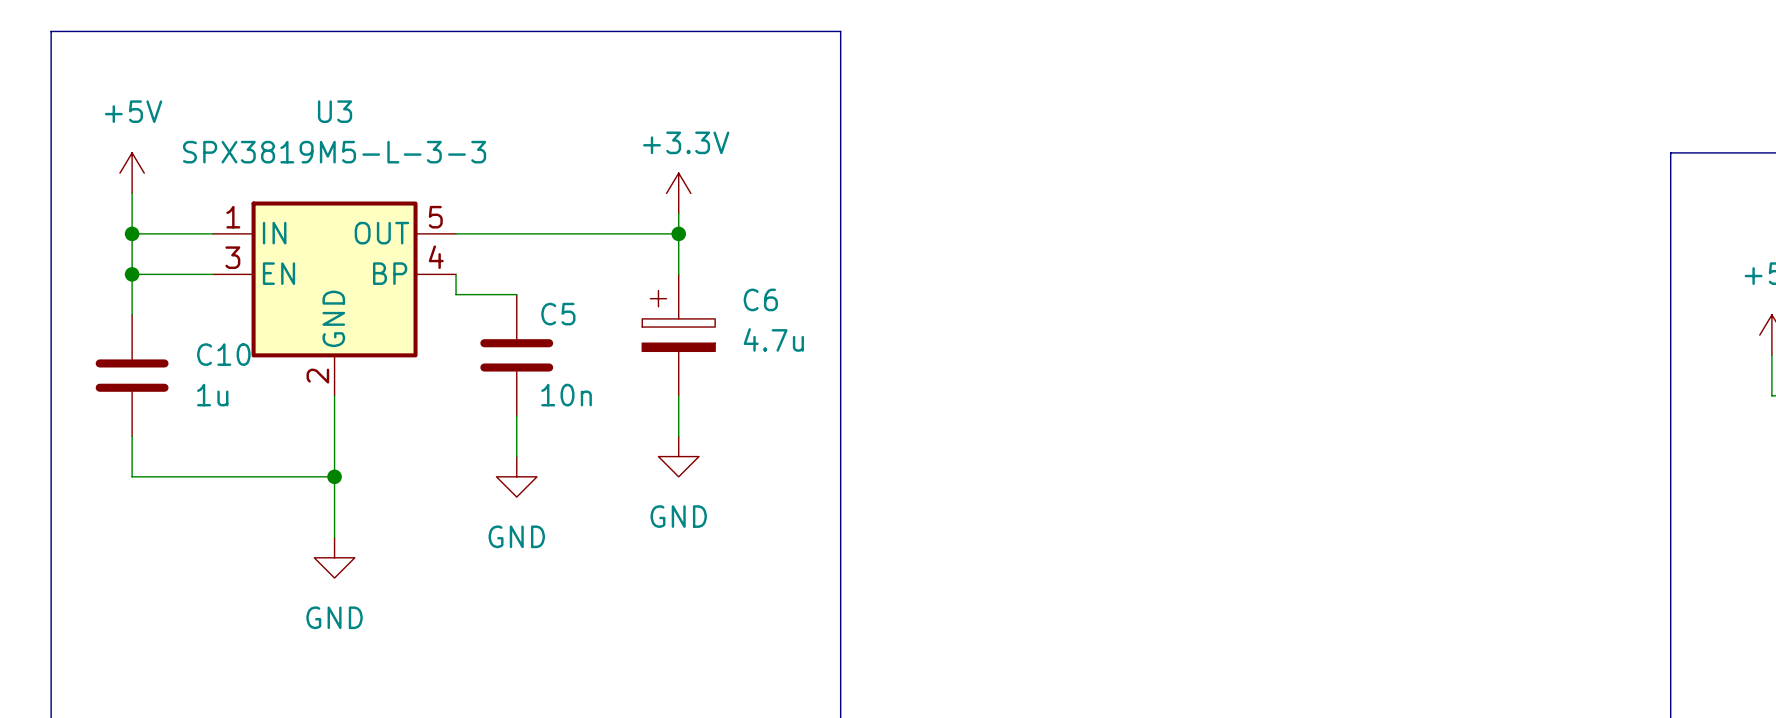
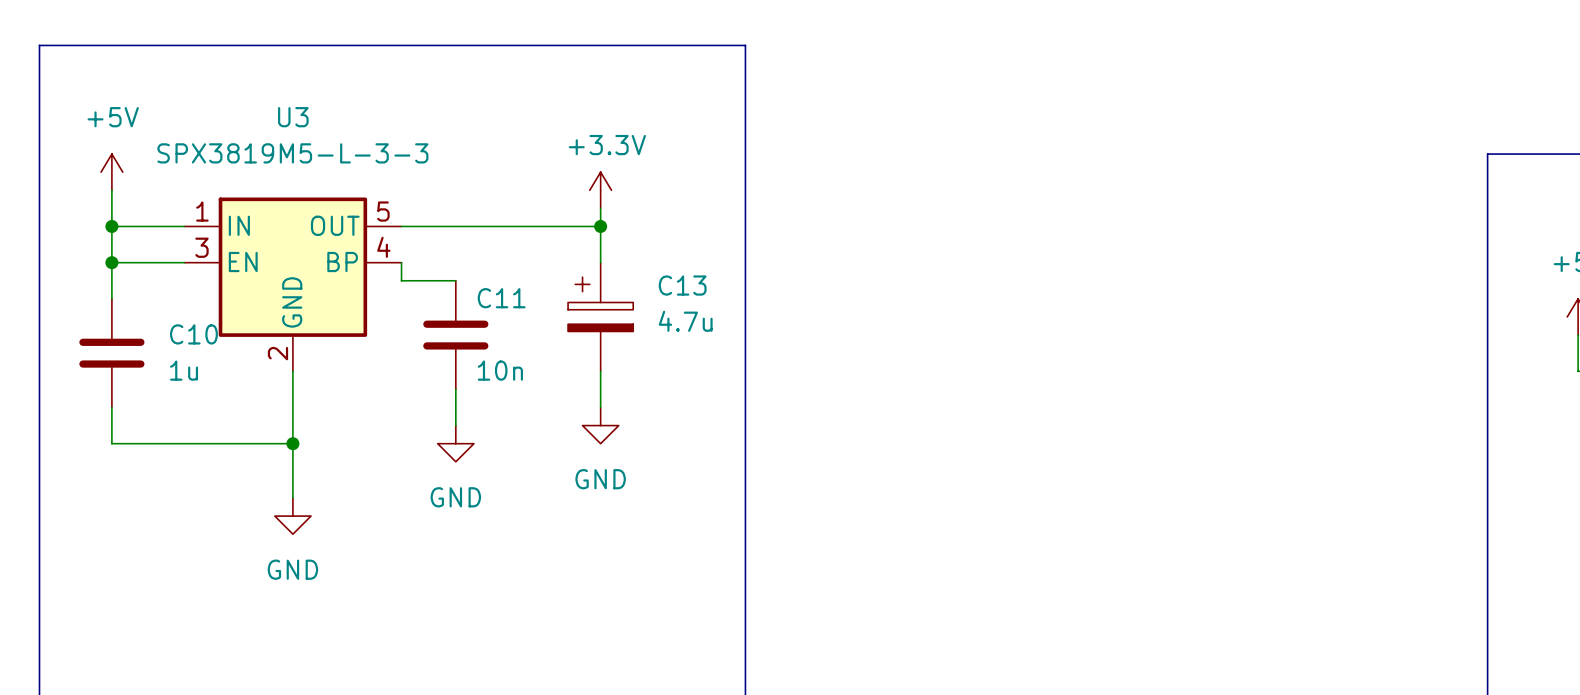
C6 name: C6 (760, 299) -> C13 (682, 285)
C5 name: C5 (558, 314) -> C11 (501, 298)

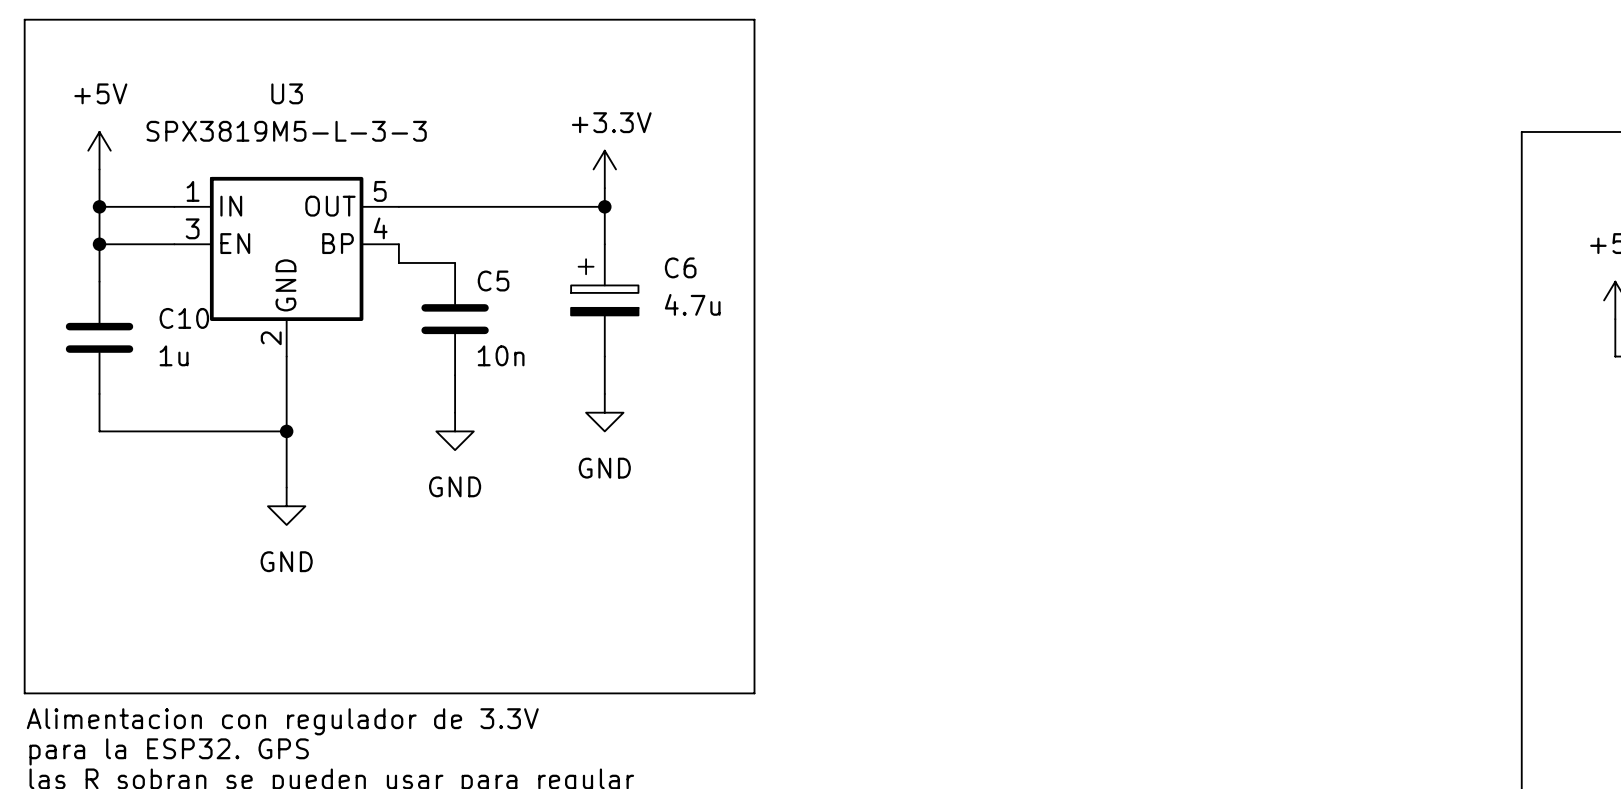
C13 name: C13 (682, 285) -> C6 (680, 267)
C11 name: C11 (501, 298) -> C5 (493, 281)

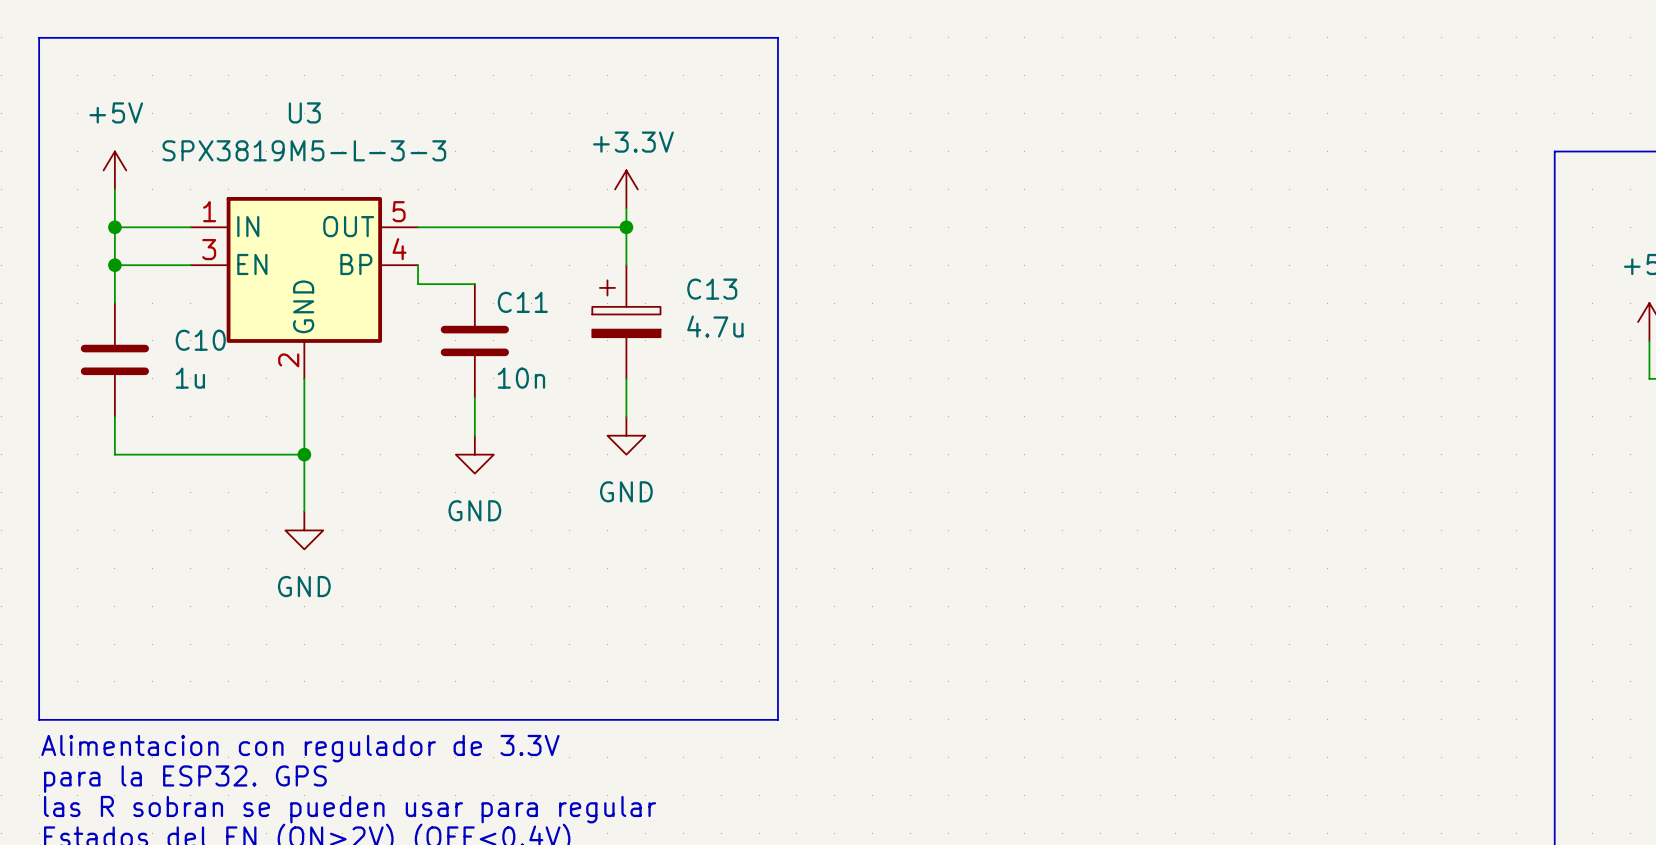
C6 name: C6 (680, 267) -> C13 (712, 289)
C5 name: C5 (493, 281) -> C11 (522, 302)

